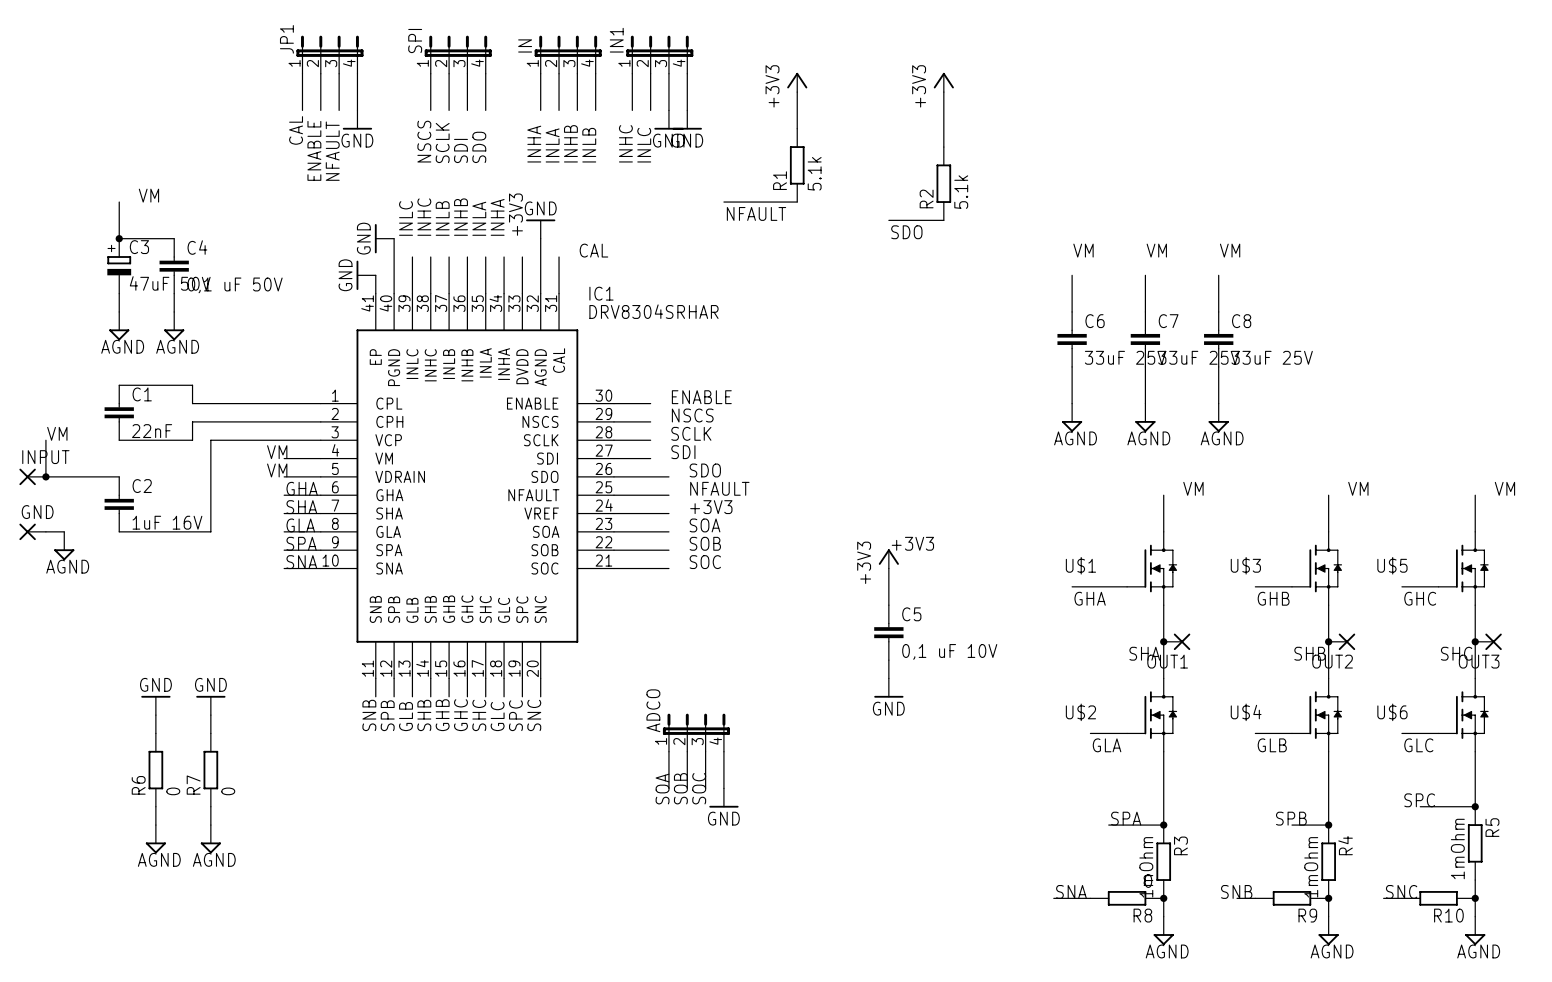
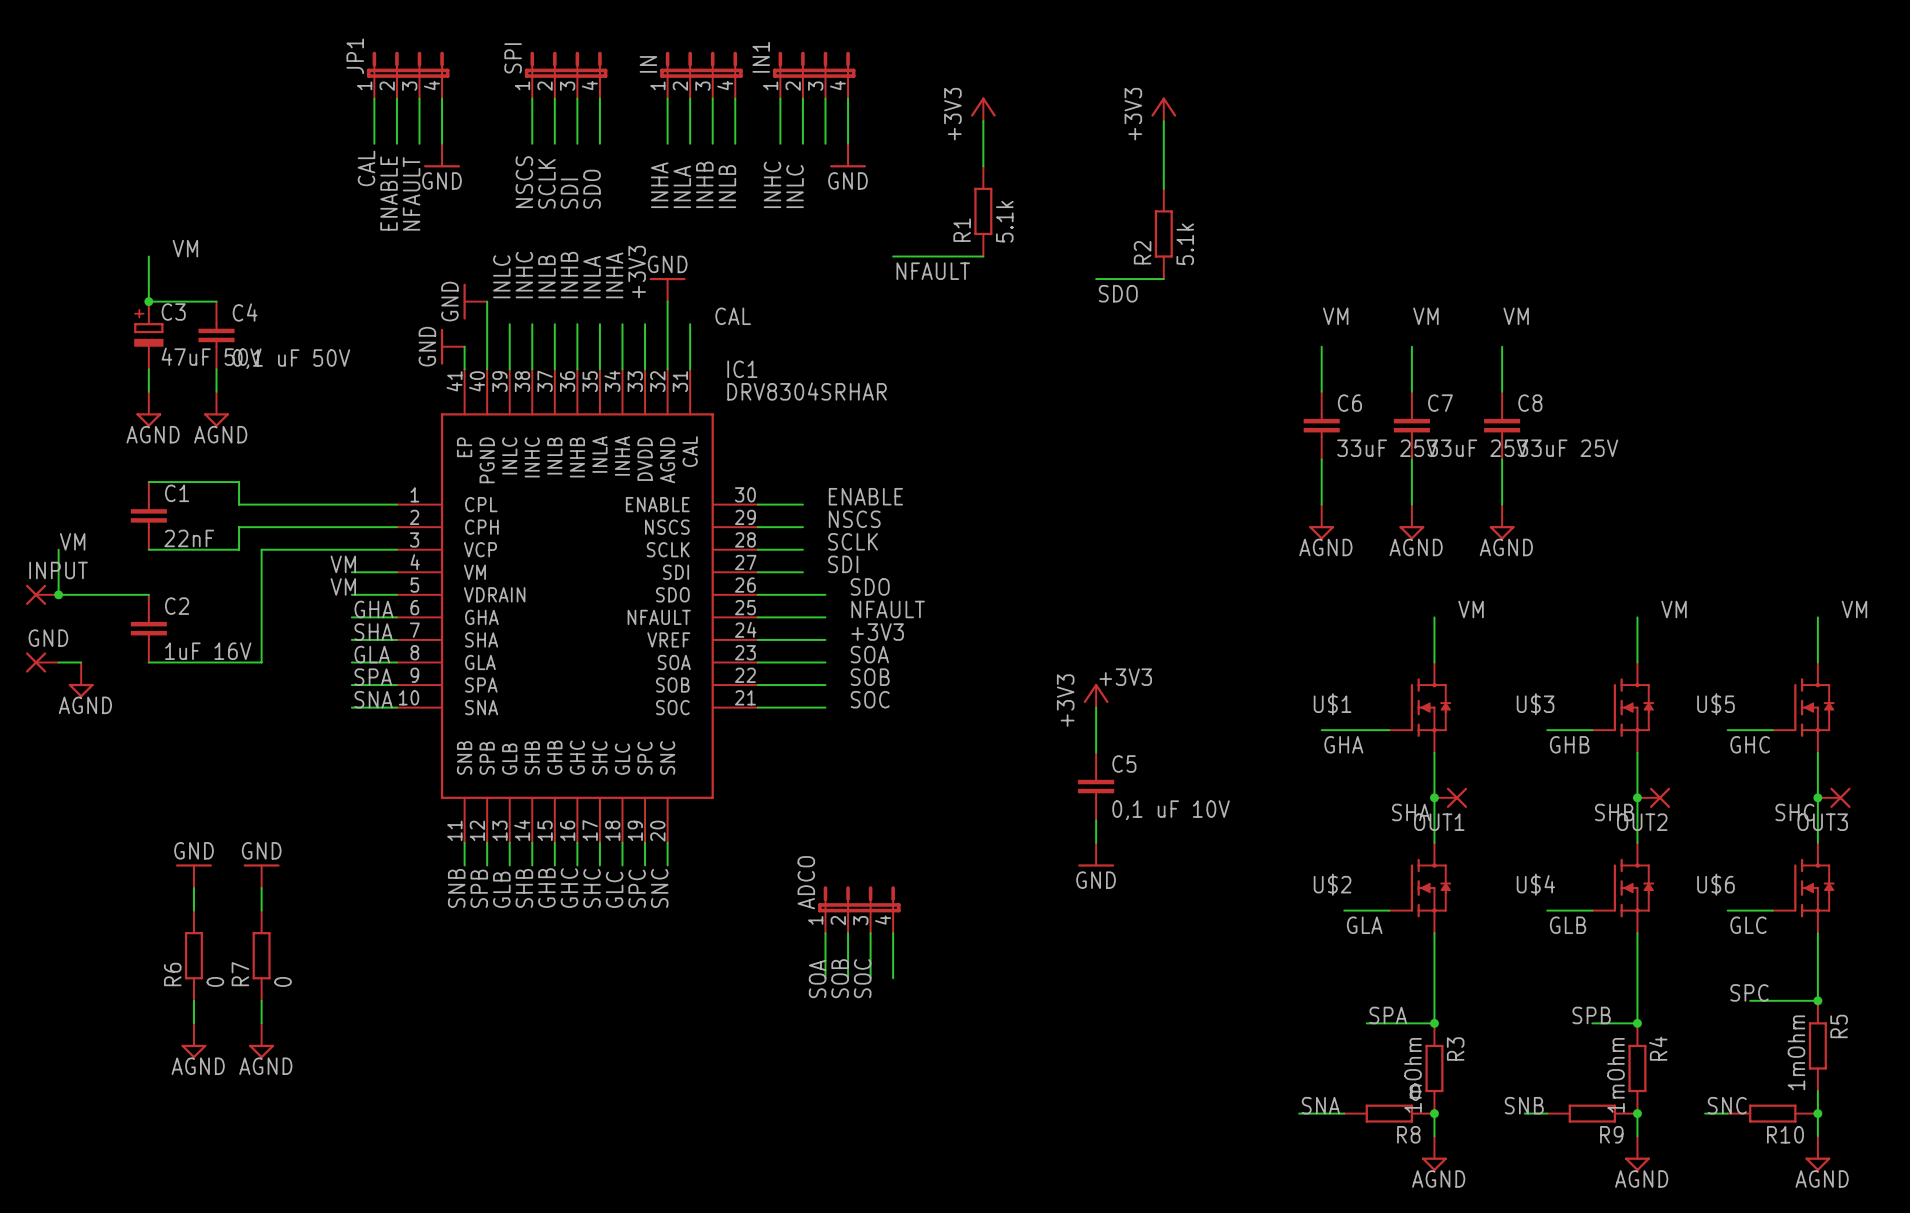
power symbol: GND (668, 120) -> none
power symbol: GND (723, 798) -> none

